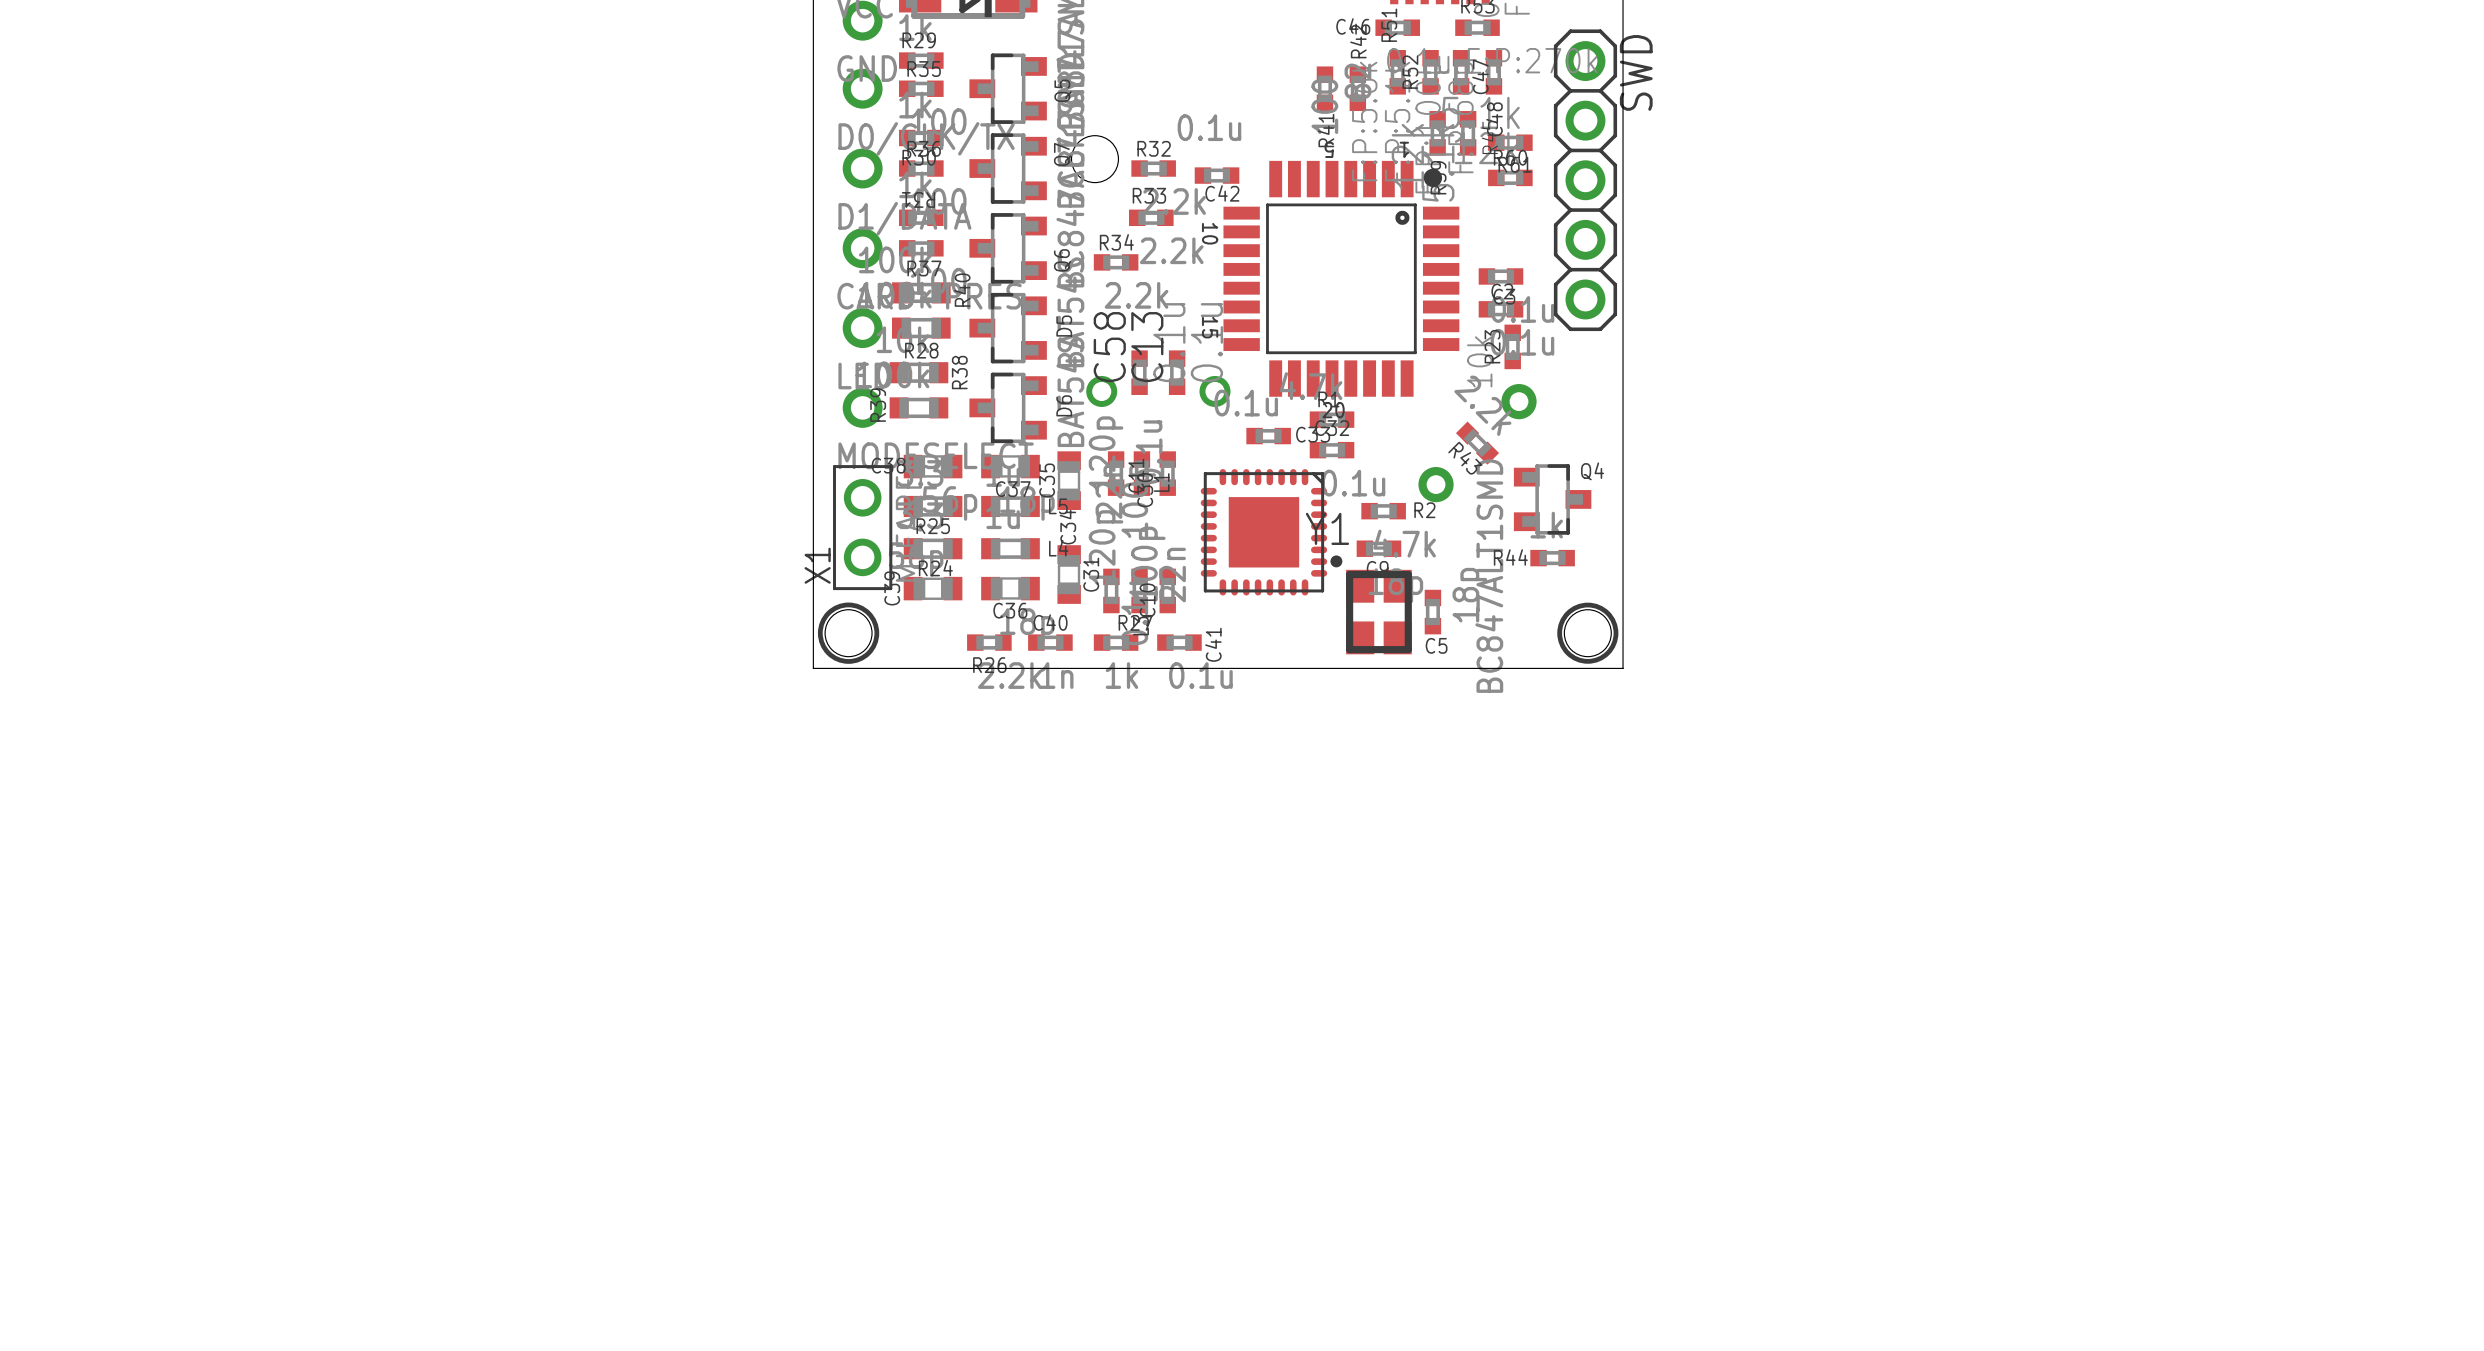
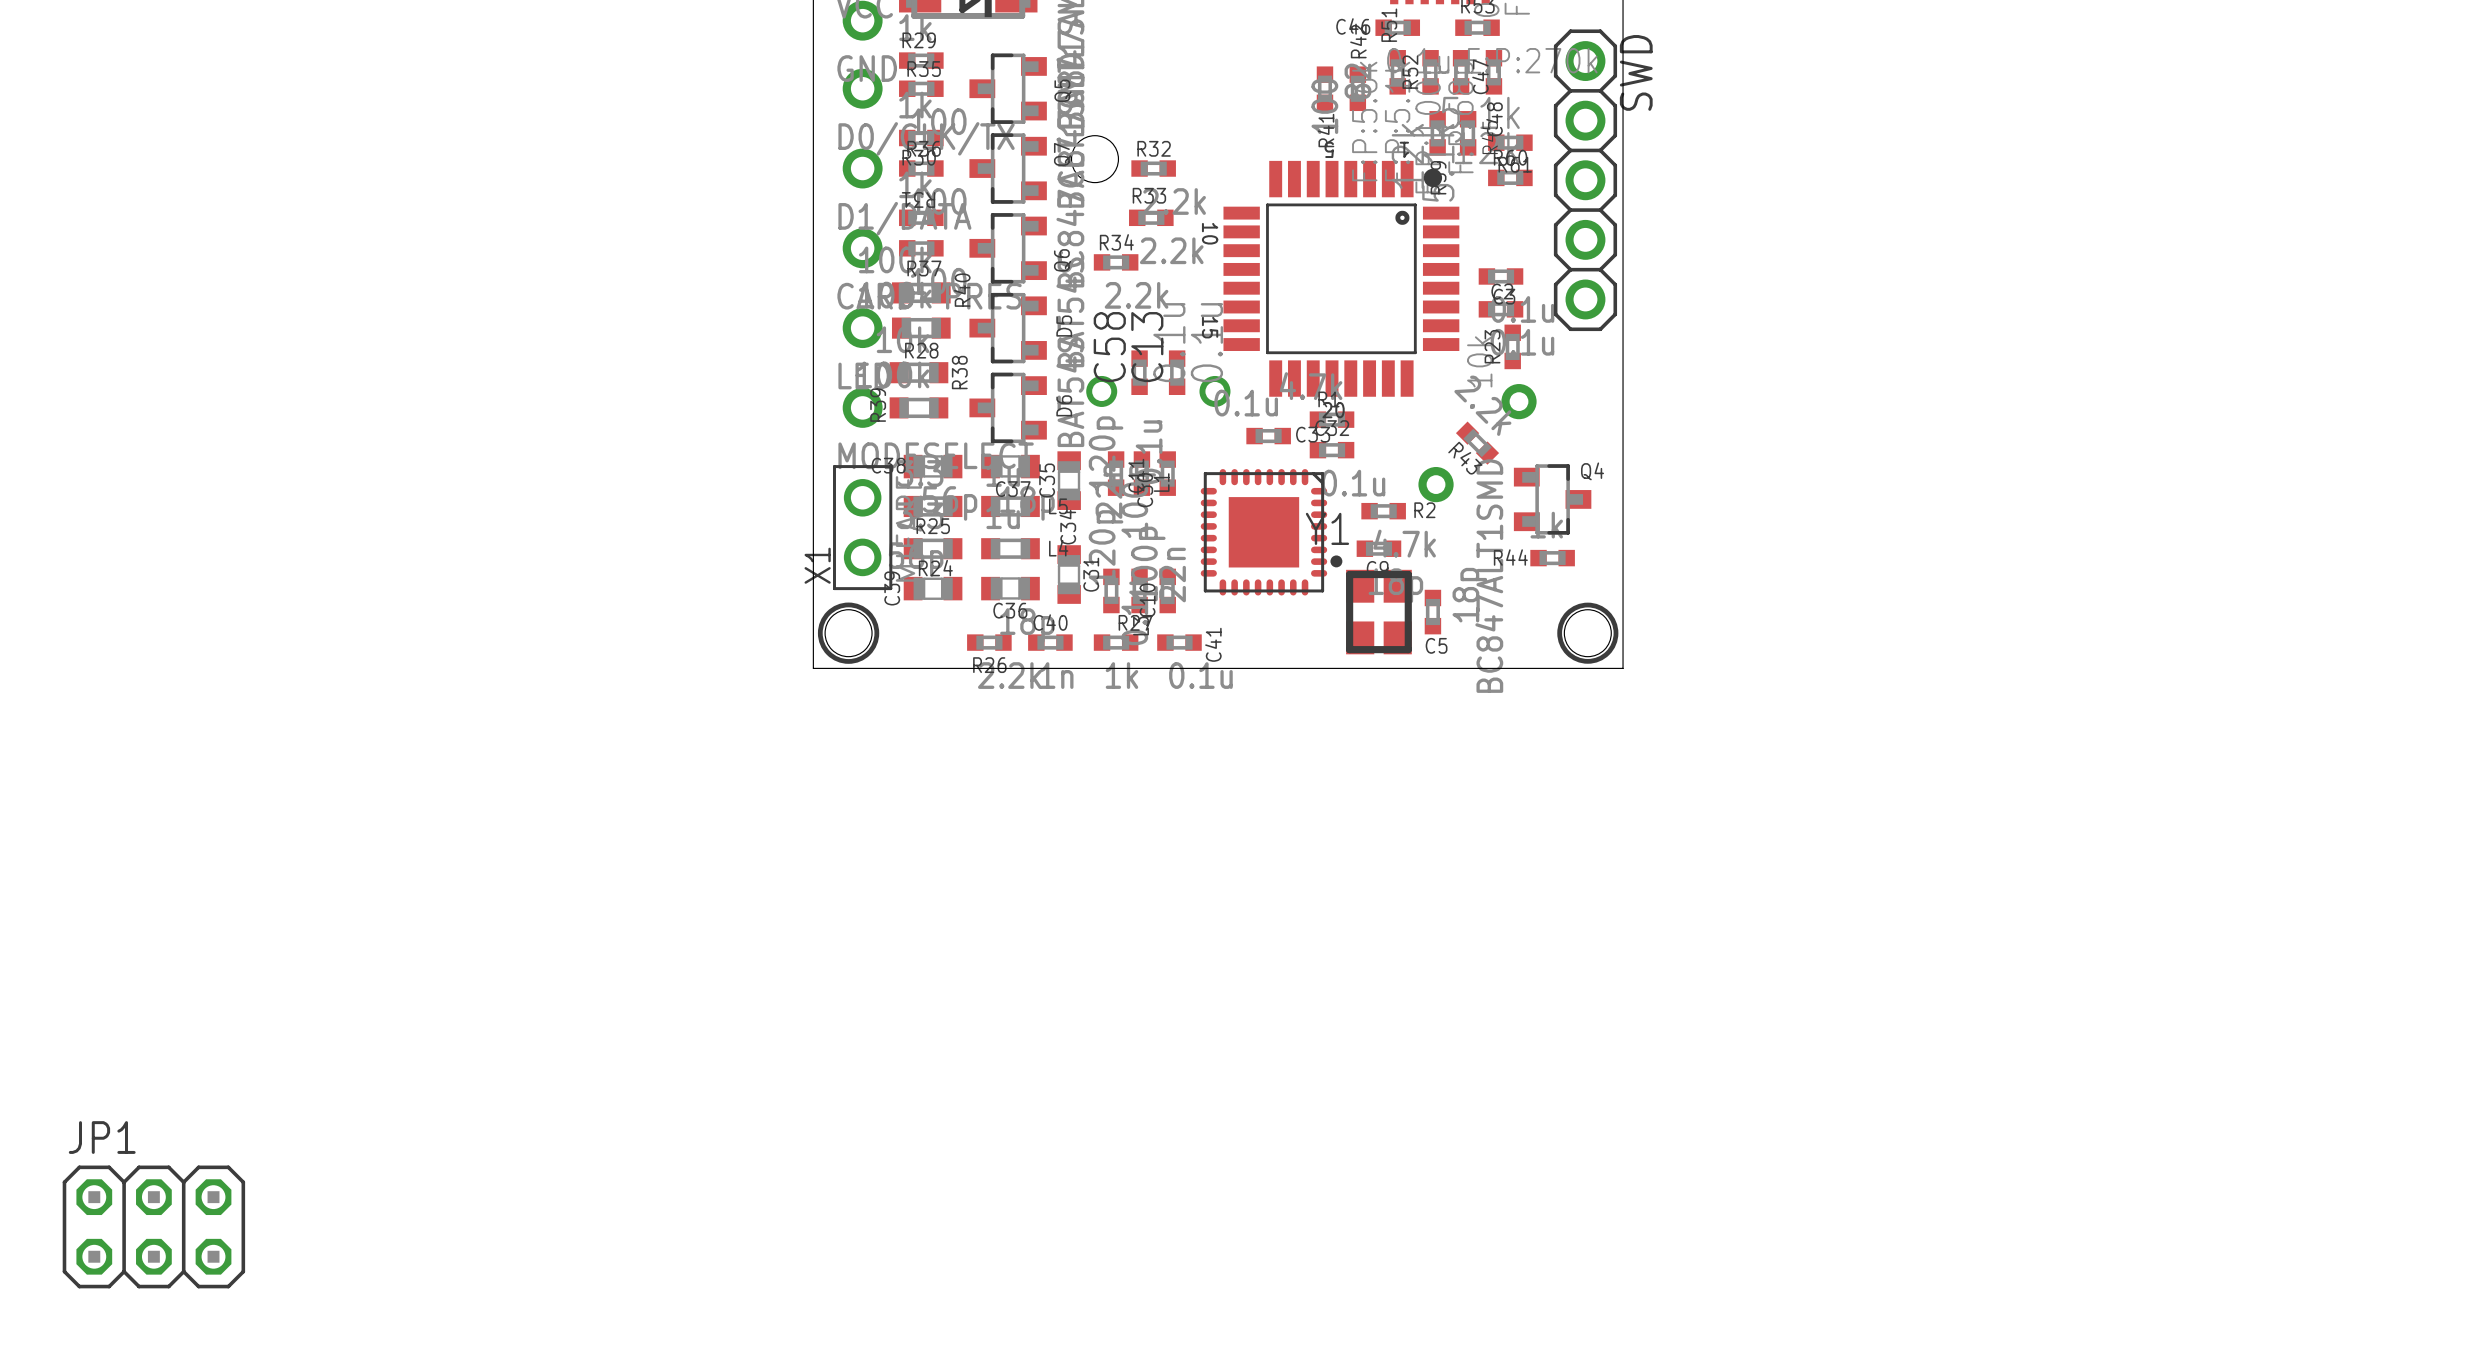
C42: 0.1u (1217, 175) -> none
JP1: none -> (153, 1226)

